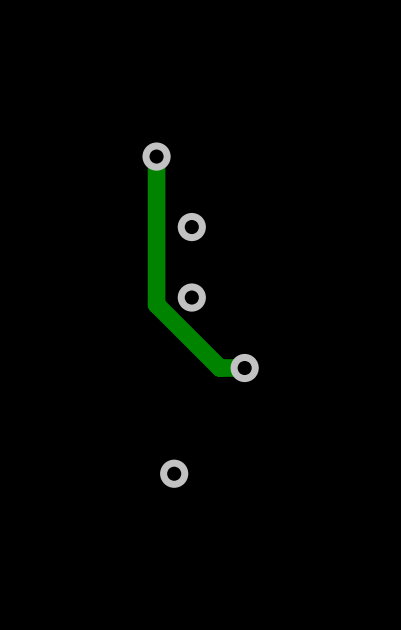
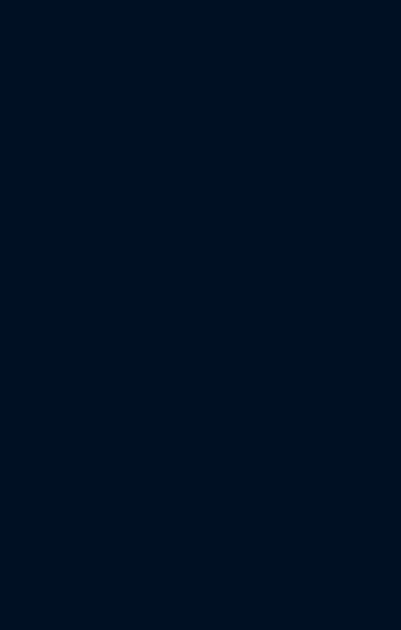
track: (156, 156) (156, 304) (219, 368) (244, 368) -> none
via: (156, 156) -> none
via: (191, 227) -> none
via: (191, 297) -> none
via: (244, 368) -> none
via: (174, 473) -> none

